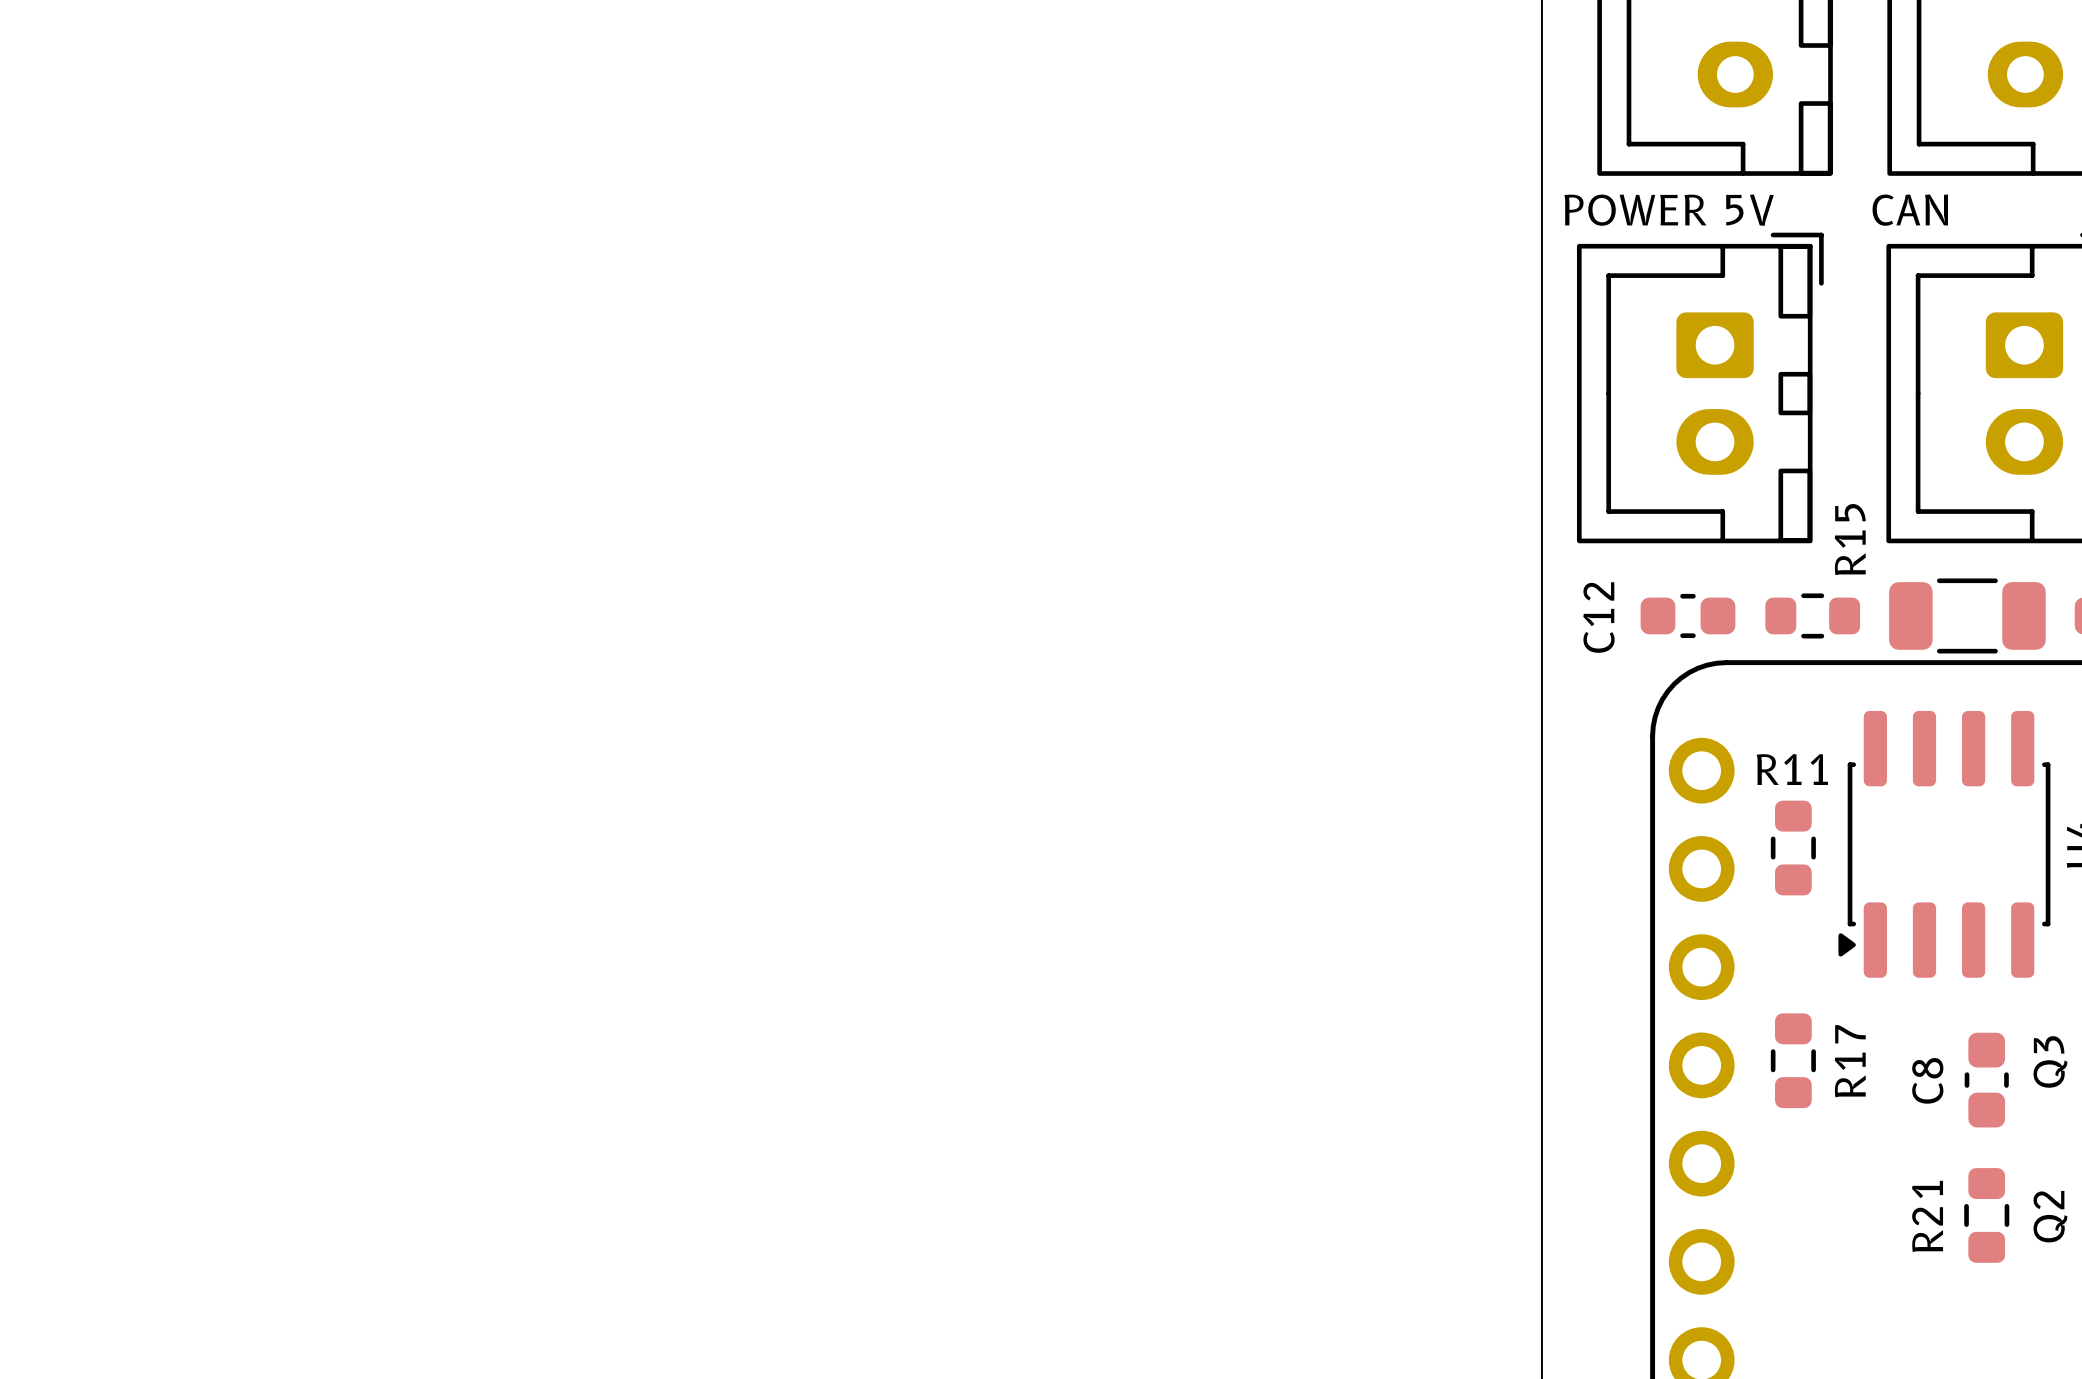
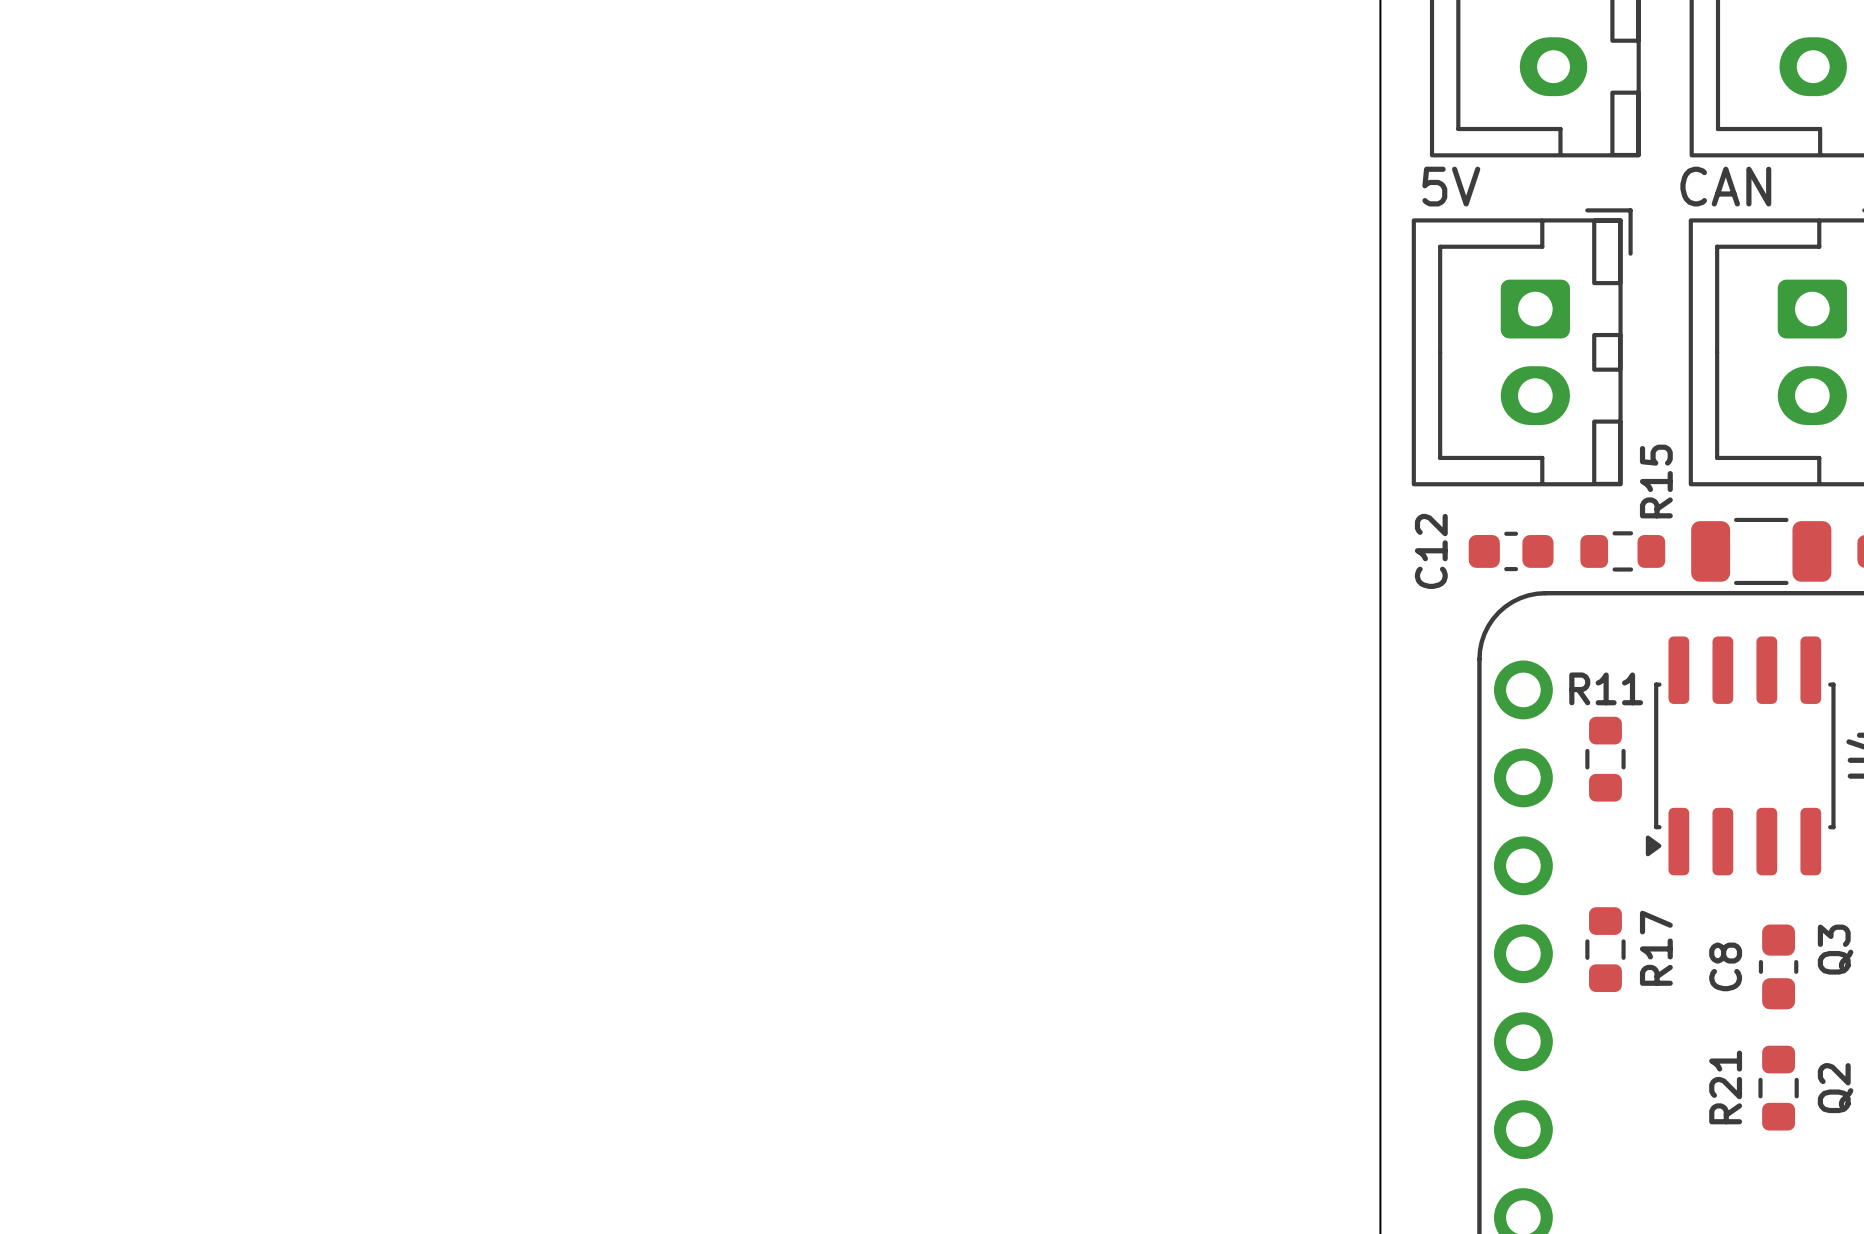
5V name: none -> 5V (1451, 186)
CAN name: none -> CAN (1725, 186)
text: POWER 5V (1669, 210) -> none
text: CAN (1910, 210) -> none

